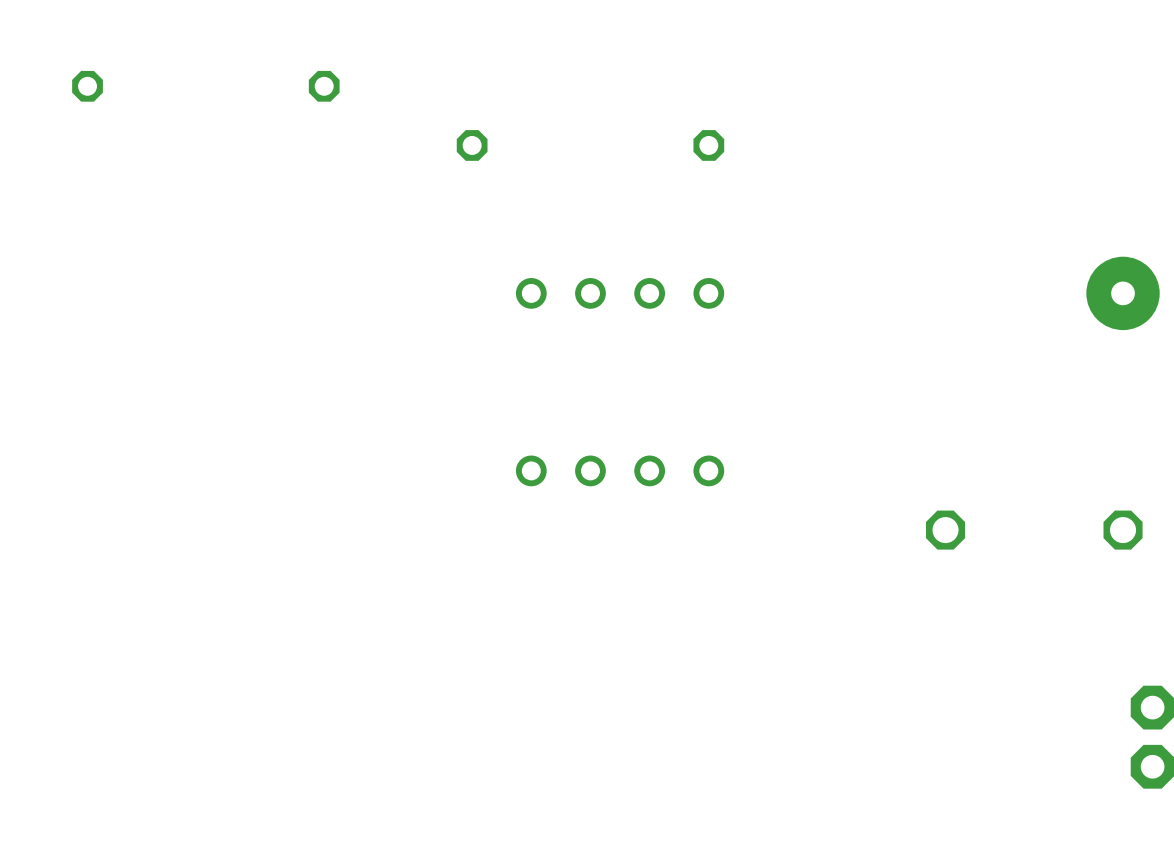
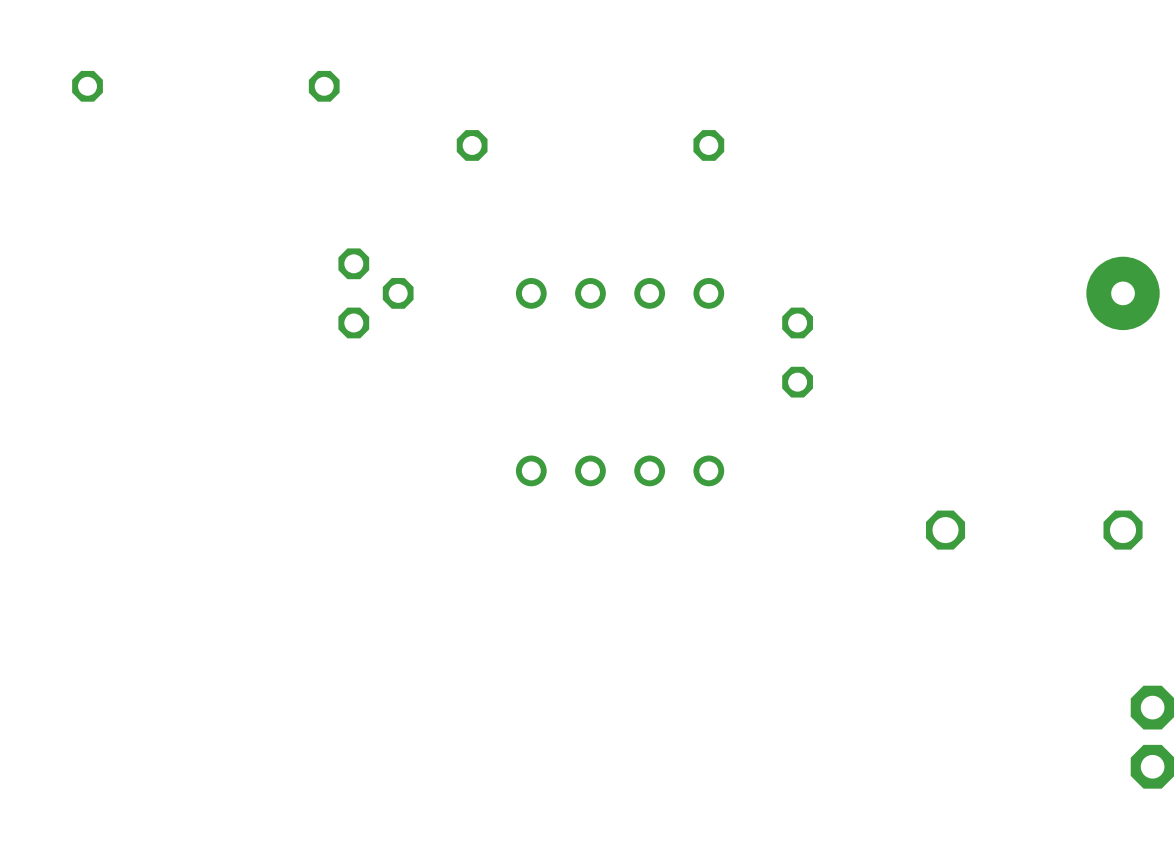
part: none -> (375, 293)
part: none -> (797, 352)

